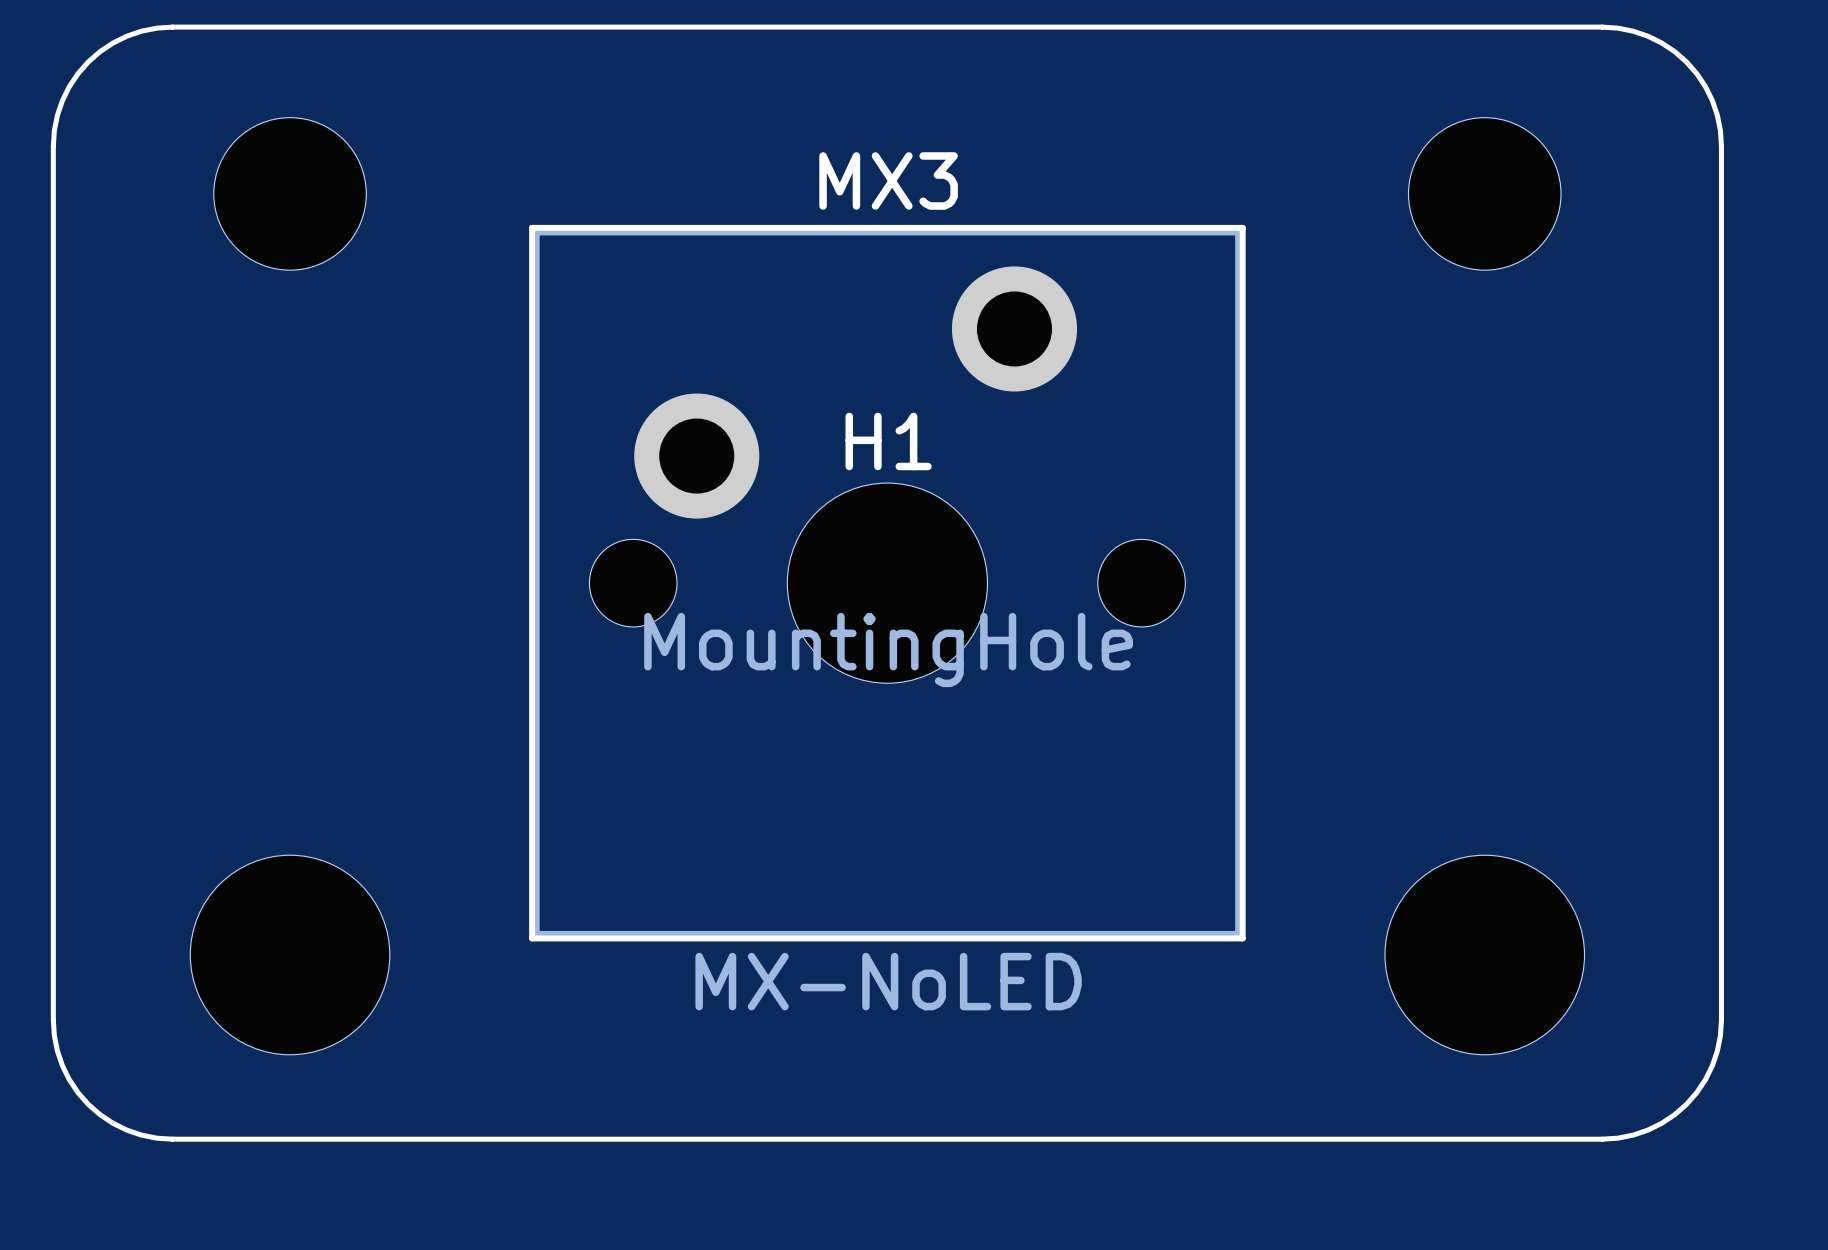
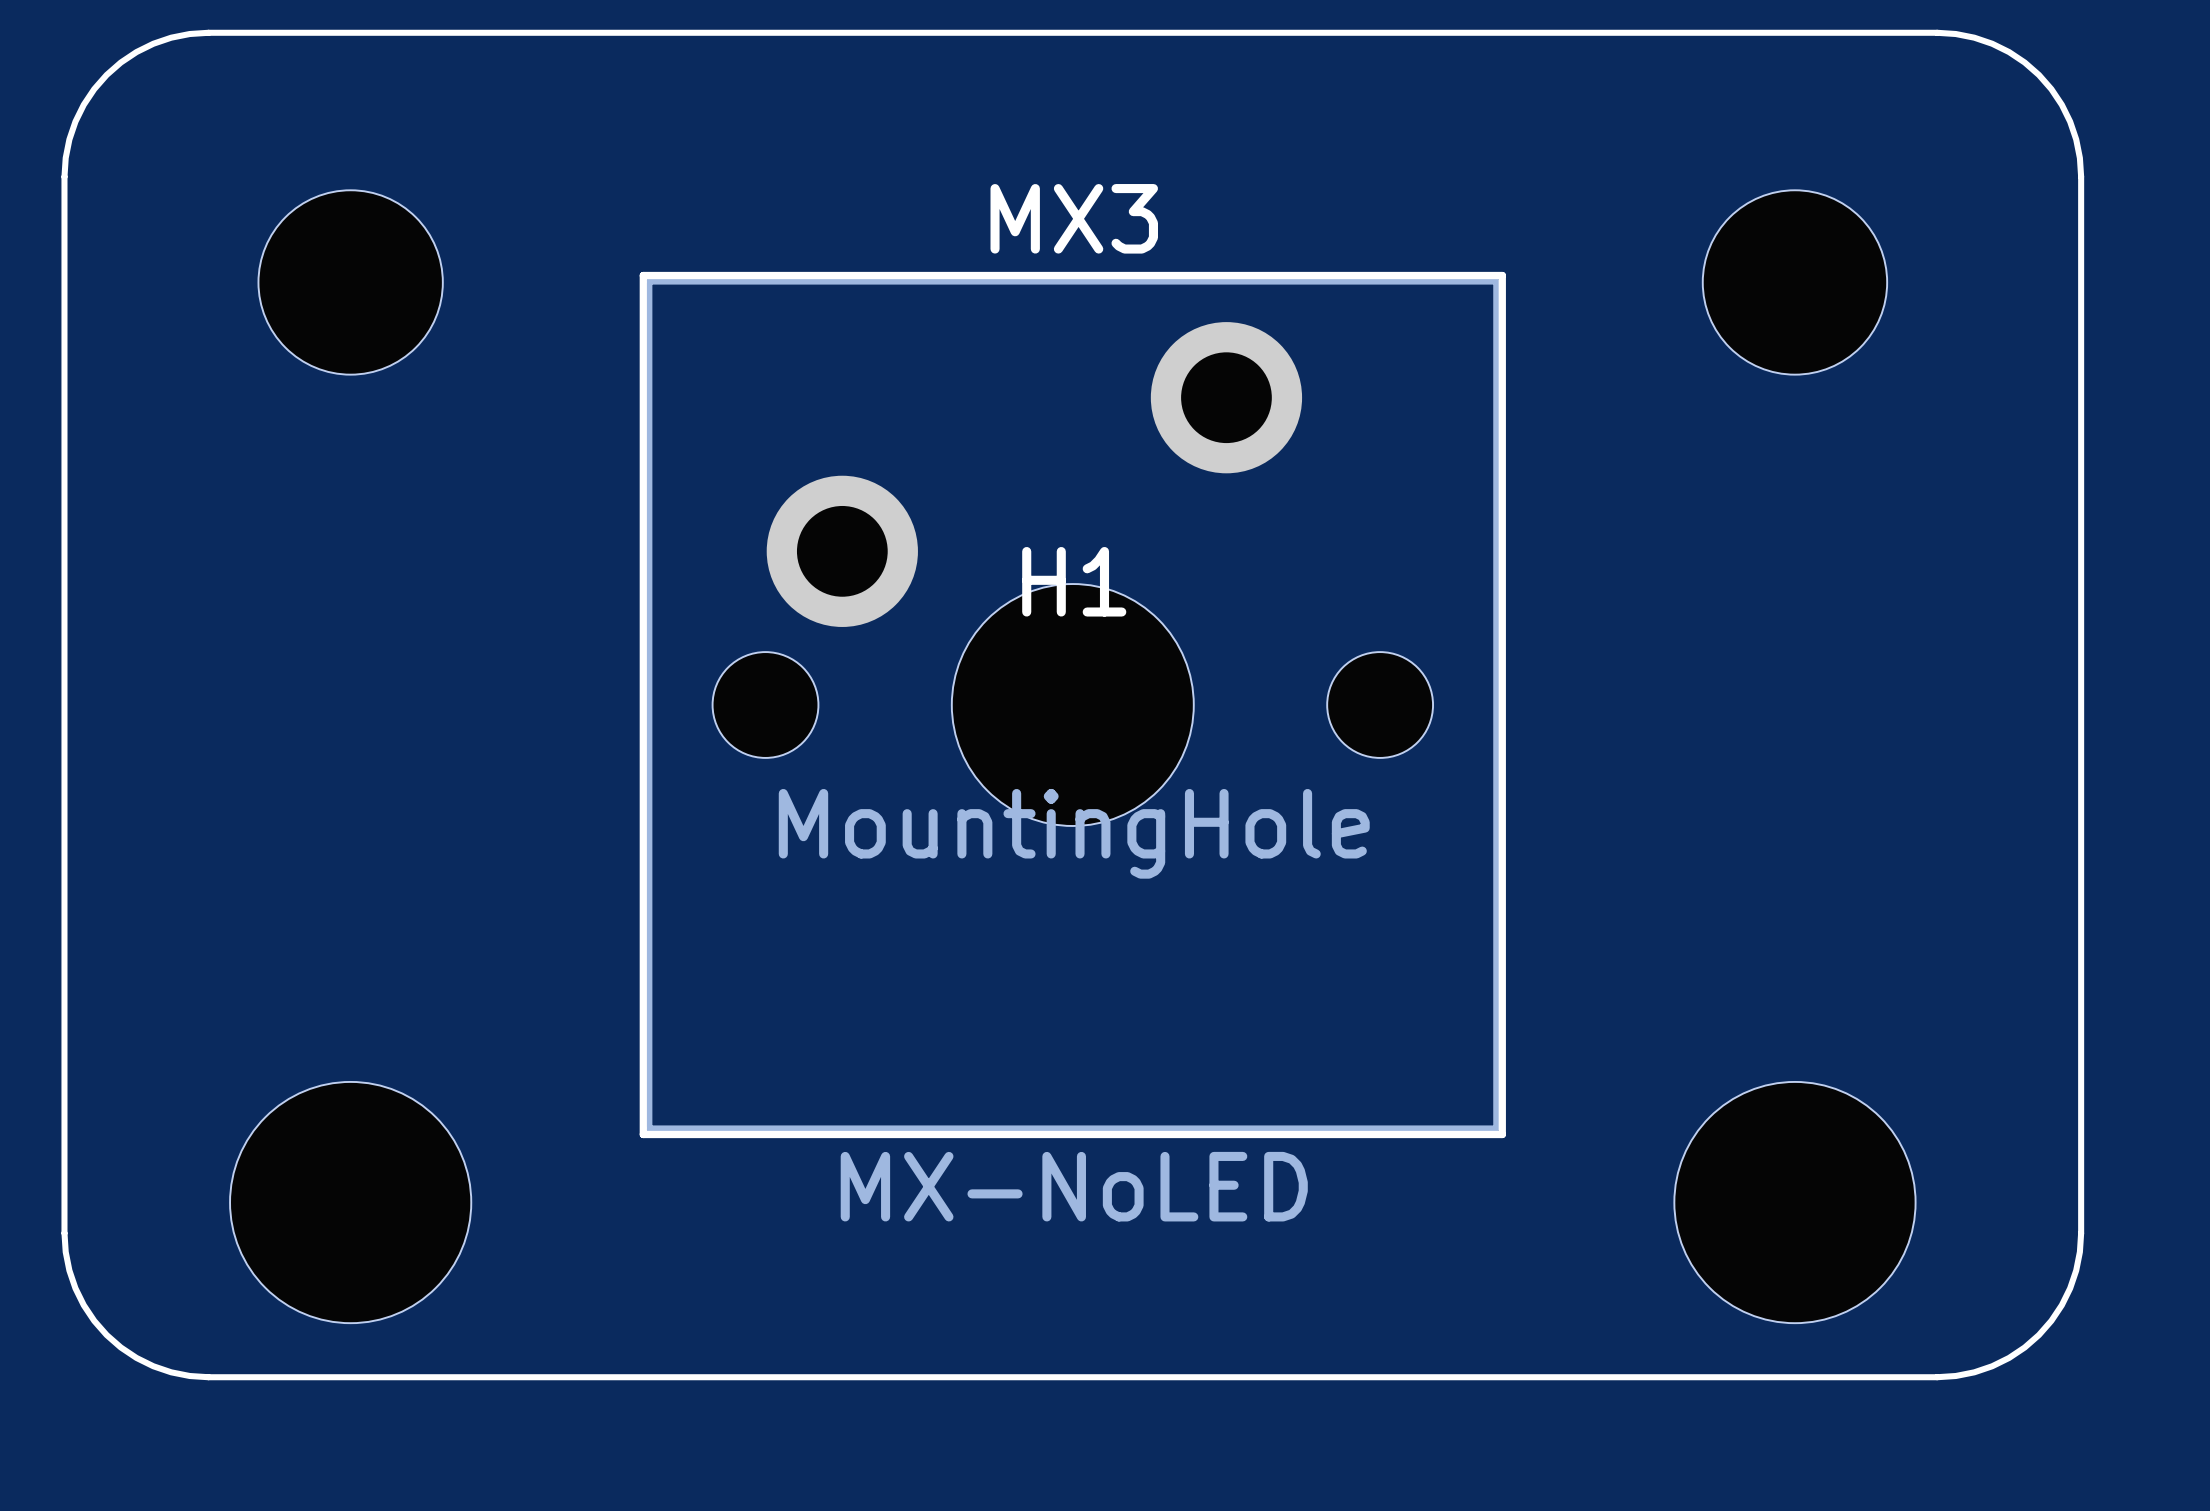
H1 position: (887, 586) -> (1072, 756)

